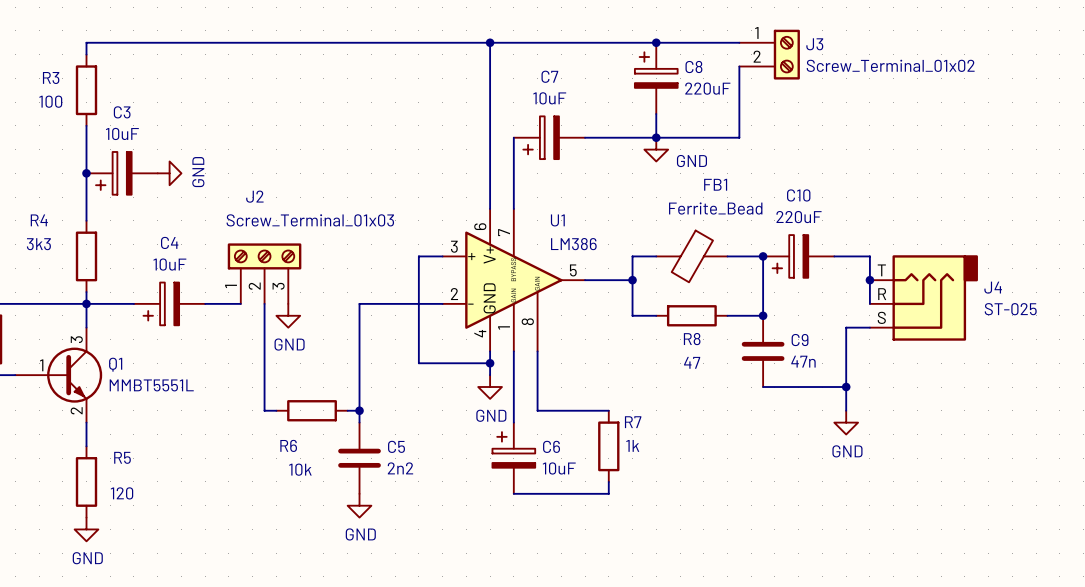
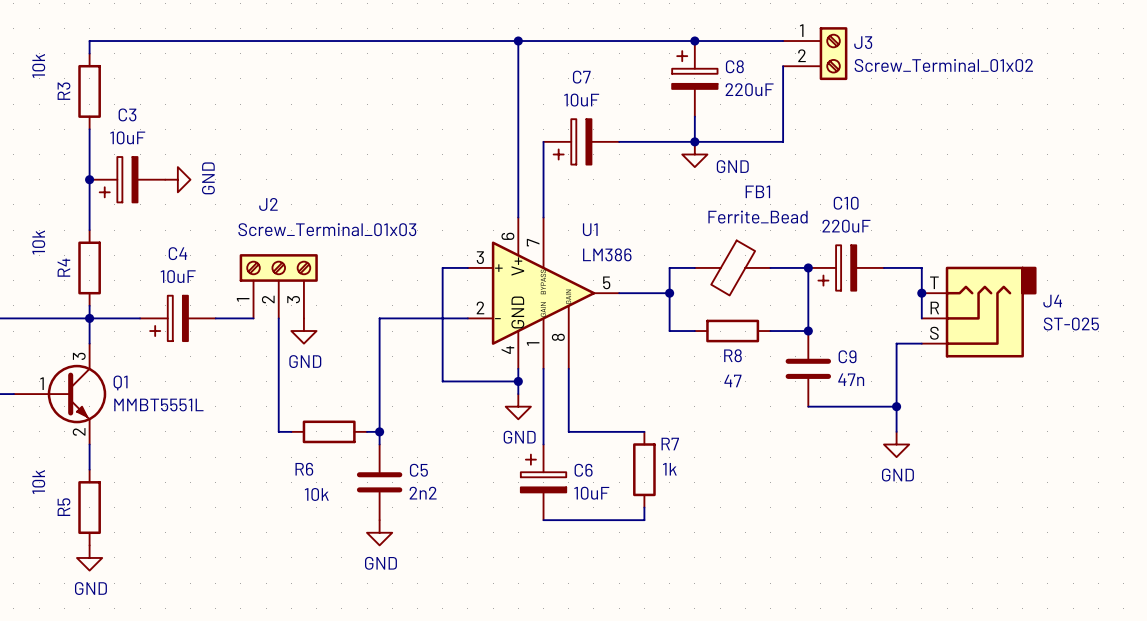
R3 name rotation: 0° (51, 78) -> 90° counterclockwise (63, 91)
R3 value: 100 (50, 101) -> 10k (38, 65)
R4 name rotation: 0° (39, 220) -> 90° counterclockwise (63, 267)
R4 name position: R4 (39, 220) -> R4 (63, 267)
R4 value: 3k3 (38, 244) -> 10k (38, 242)
R5 name rotation: 0° (122, 457) -> 90° counterclockwise (63, 507)
R5 name position: R5 (122, 457) -> R5 (63, 507)
R5 value: 120 (122, 493) -> 10k (38, 482)

